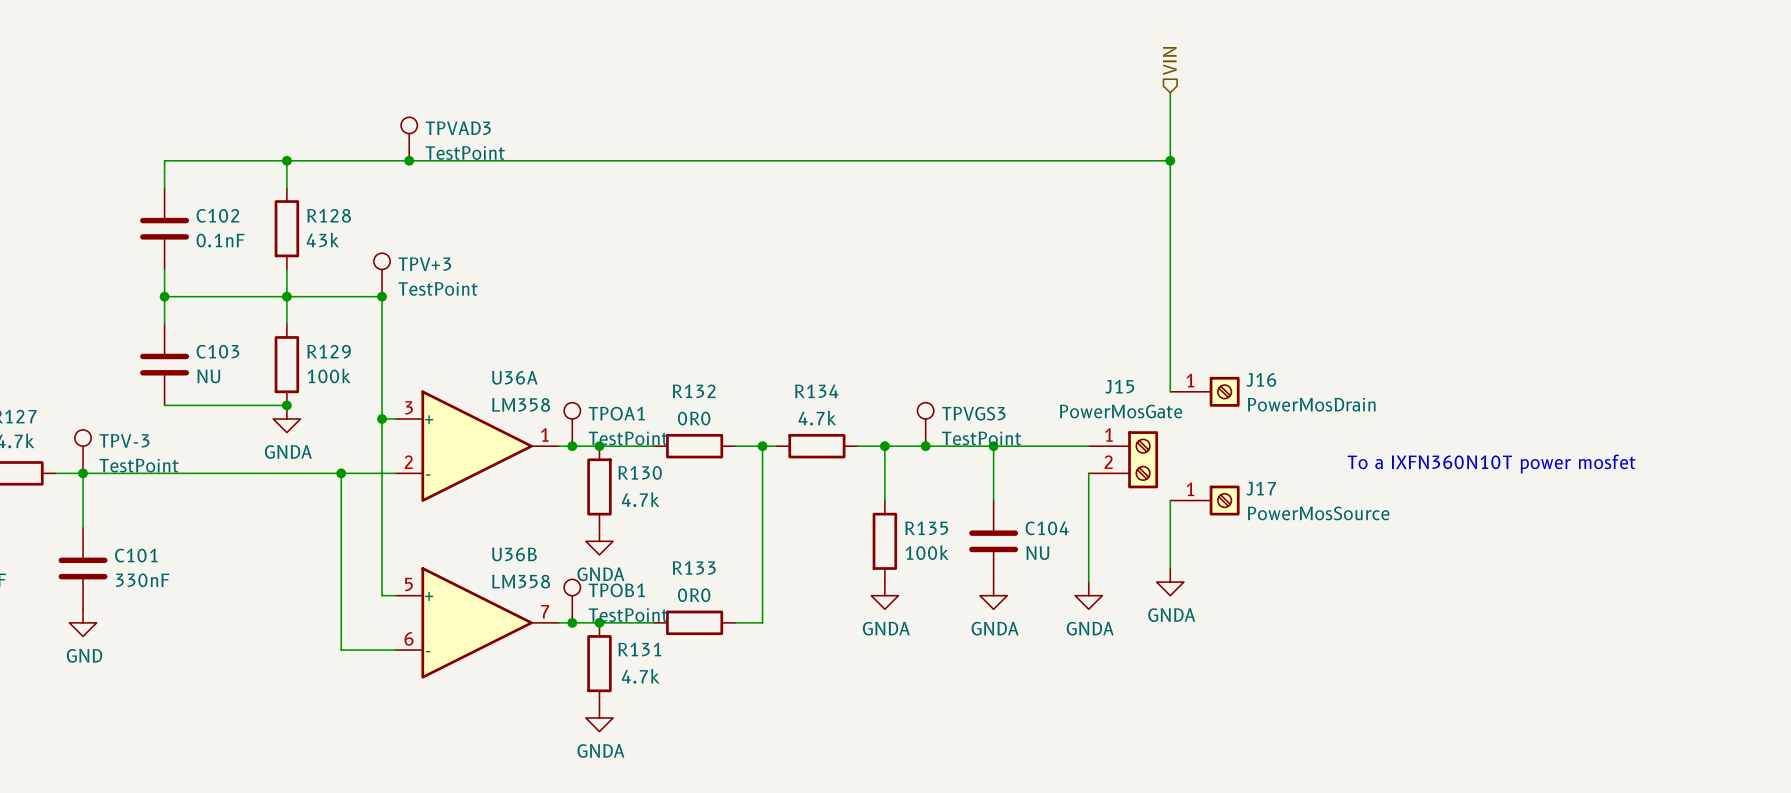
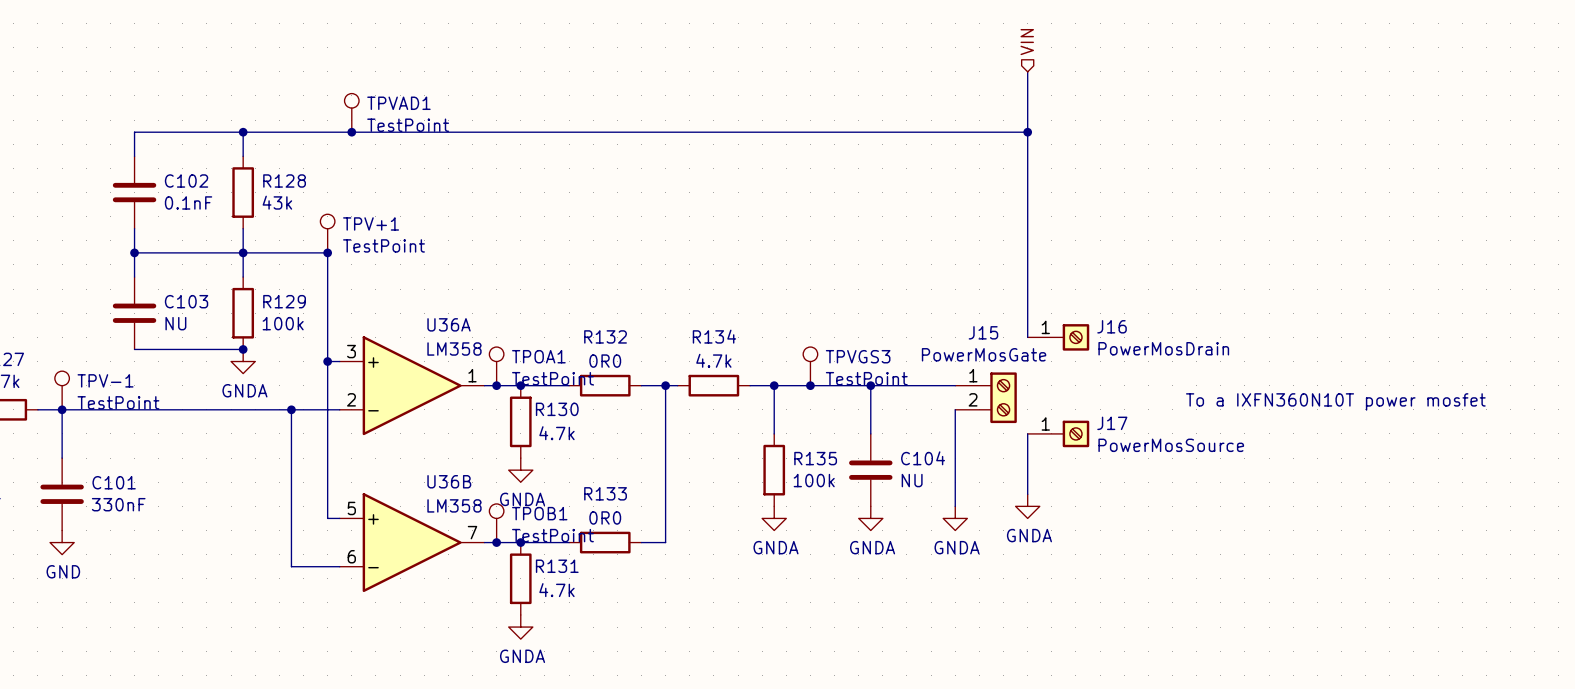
TPVAD3 name: TPVAD3 (458, 128) -> TPVAD1 (398, 103)
TPV+3 name: TPV+3 (424, 264) -> TPV+1 (371, 223)
TPV-3 name: TPV-3 (124, 440) -> TPV-1 (105, 380)

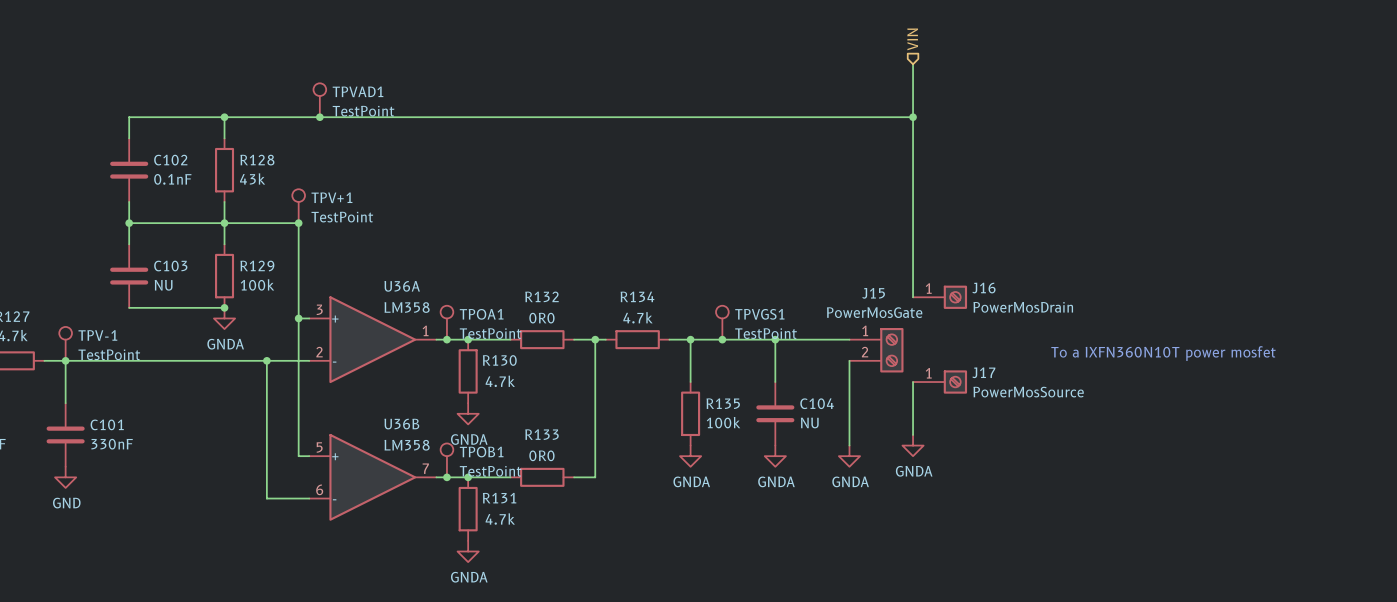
TPVGS3 name: TPVGS3 (858, 356) -> TPVGS1 (759, 314)

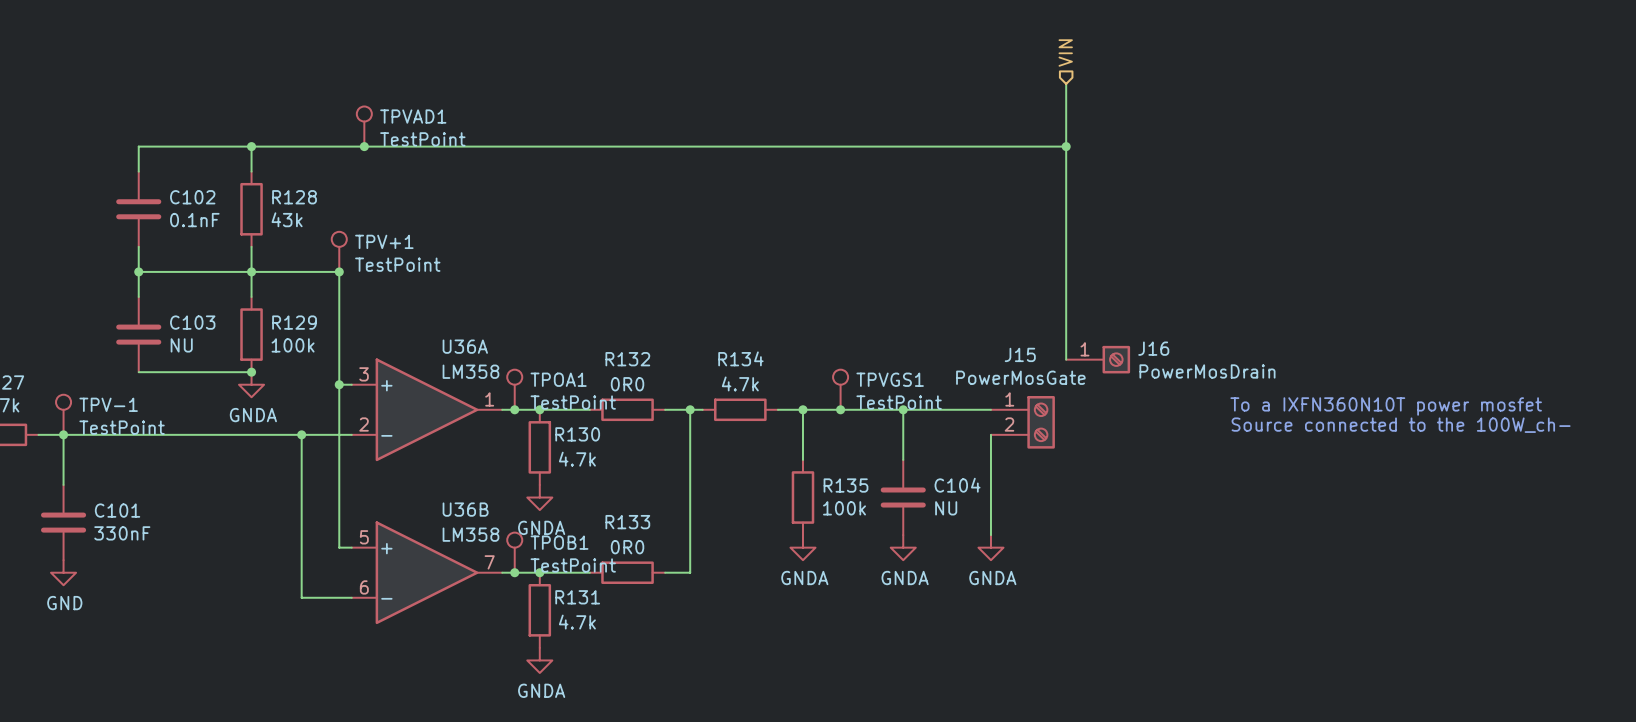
text: none -> To a IXFN360N10T power mosfet (1386, 406)
text: To a IXFN360N10T power mosfet (1163, 353) -> Source connected to the 100W_ch- (1401, 425)
wire: (913, 382) (913, 434) -> none
J17: PowerMosSource (940, 382) -> none
power symbol: GNDA (913, 445) -> none

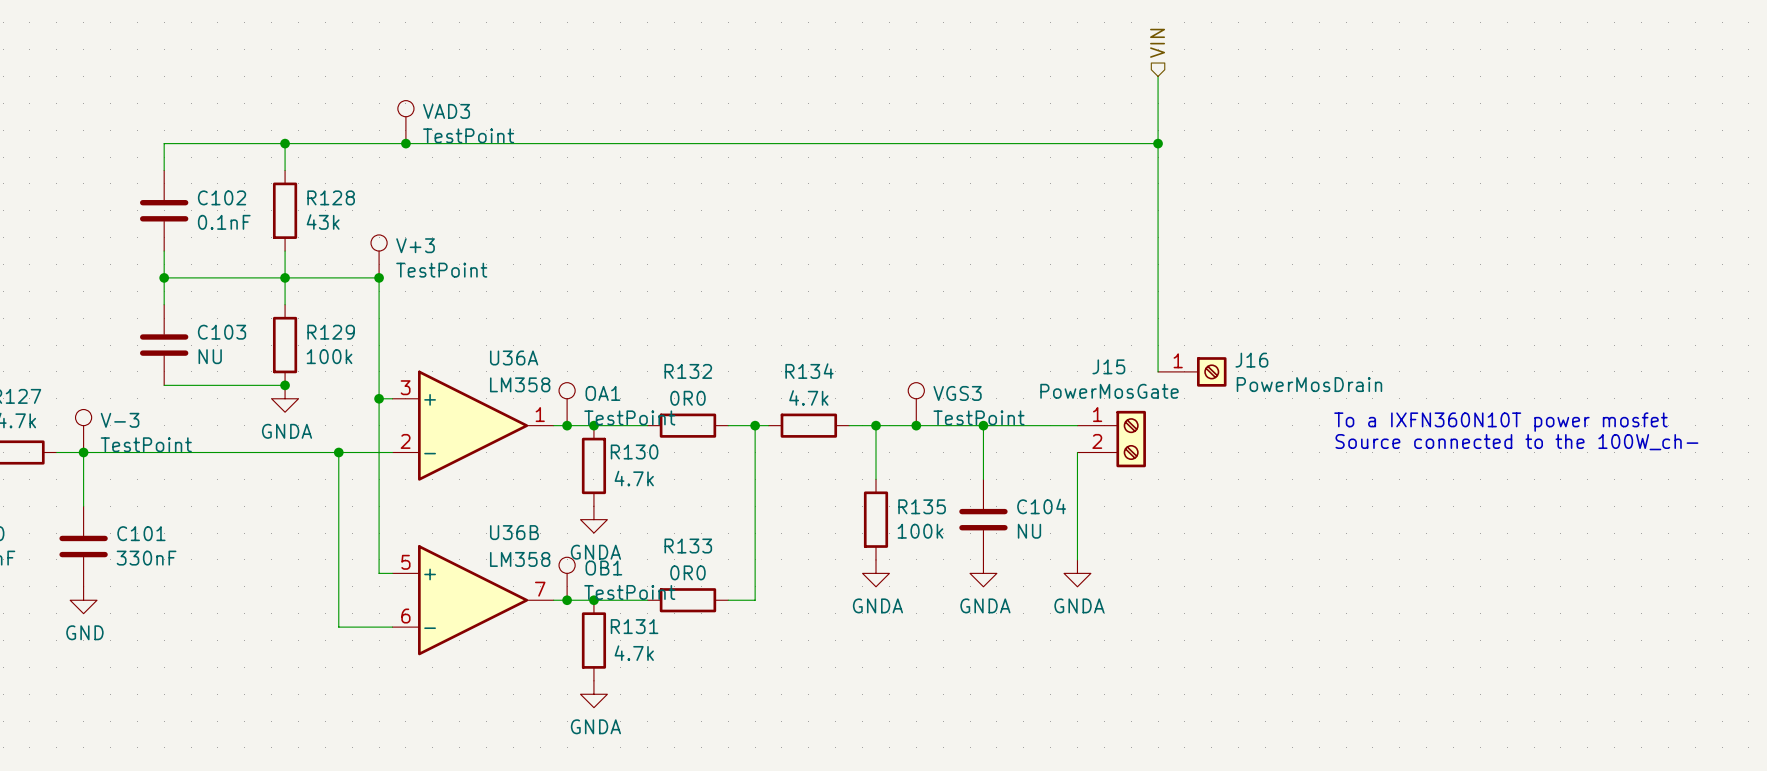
TPVAD1 name: TPVAD1 (413, 116) -> VAD3 (446, 111)
TPV+1 name: TPV+1 (384, 241) -> V+3 (415, 245)
TPOA1 name: TPOA1 (558, 379) -> OA1 (602, 393)
TPVGS1 name: TPVGS1 (890, 379) -> VGS3 (957, 393)
TPV-1 name: TPV-1 (108, 404) -> V-3 (120, 420)
TPOB1 name: TPOB1 (559, 542) -> OB1 (603, 568)

